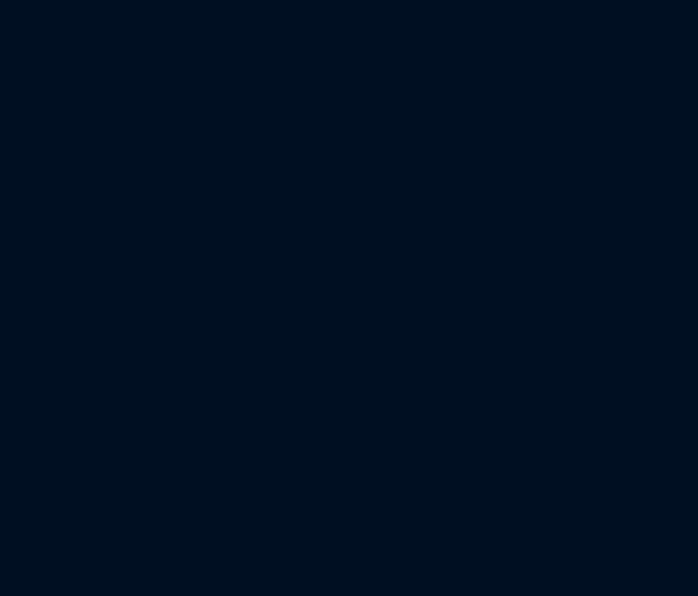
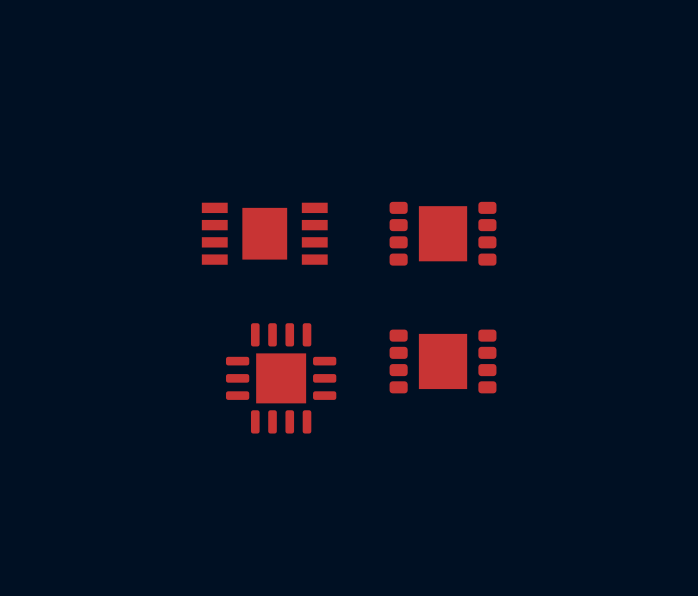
part: none -> (264, 233)
part: none -> (443, 233)
part: none -> (443, 361)
part: none -> (281, 378)

